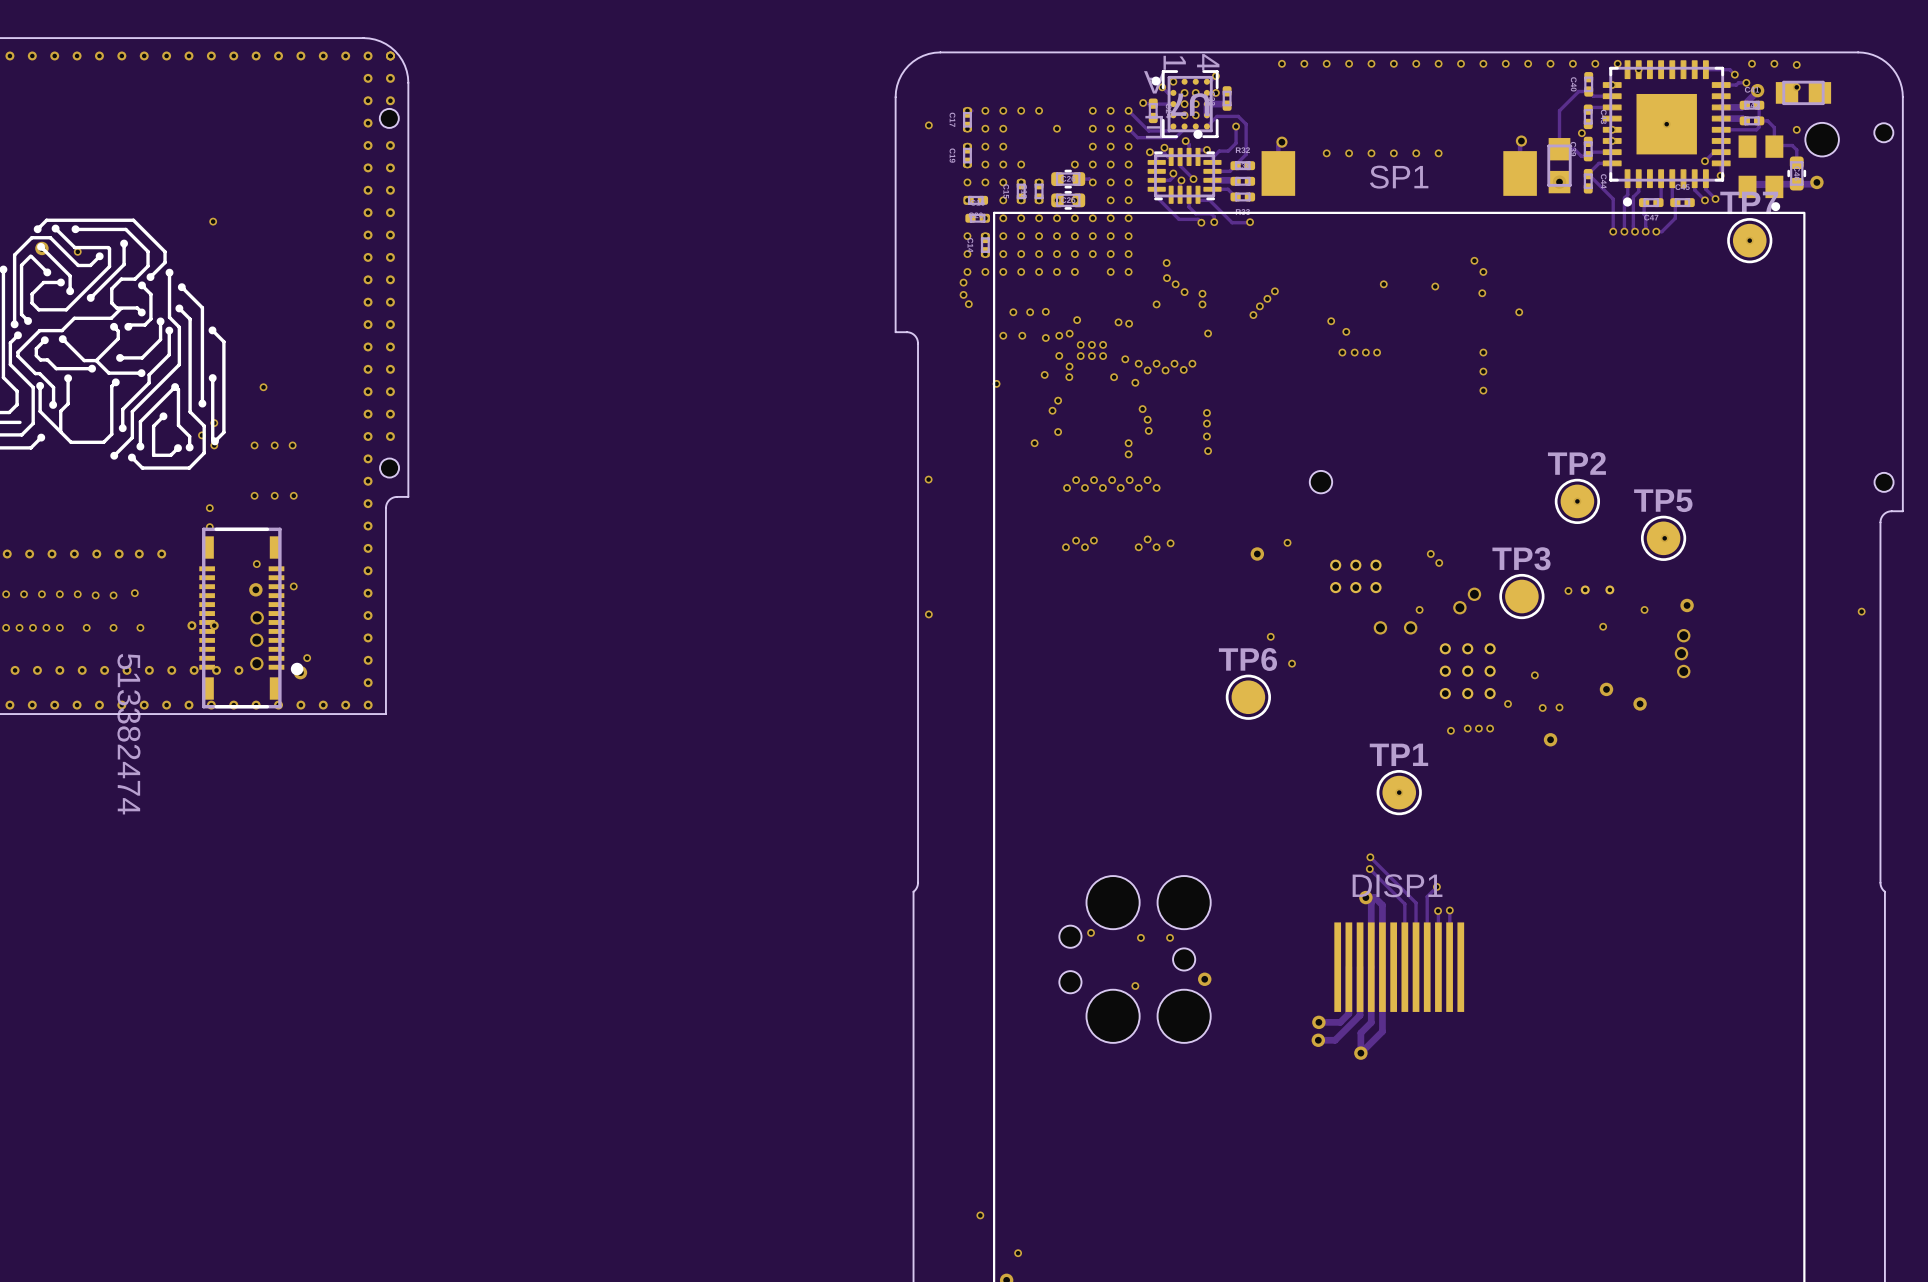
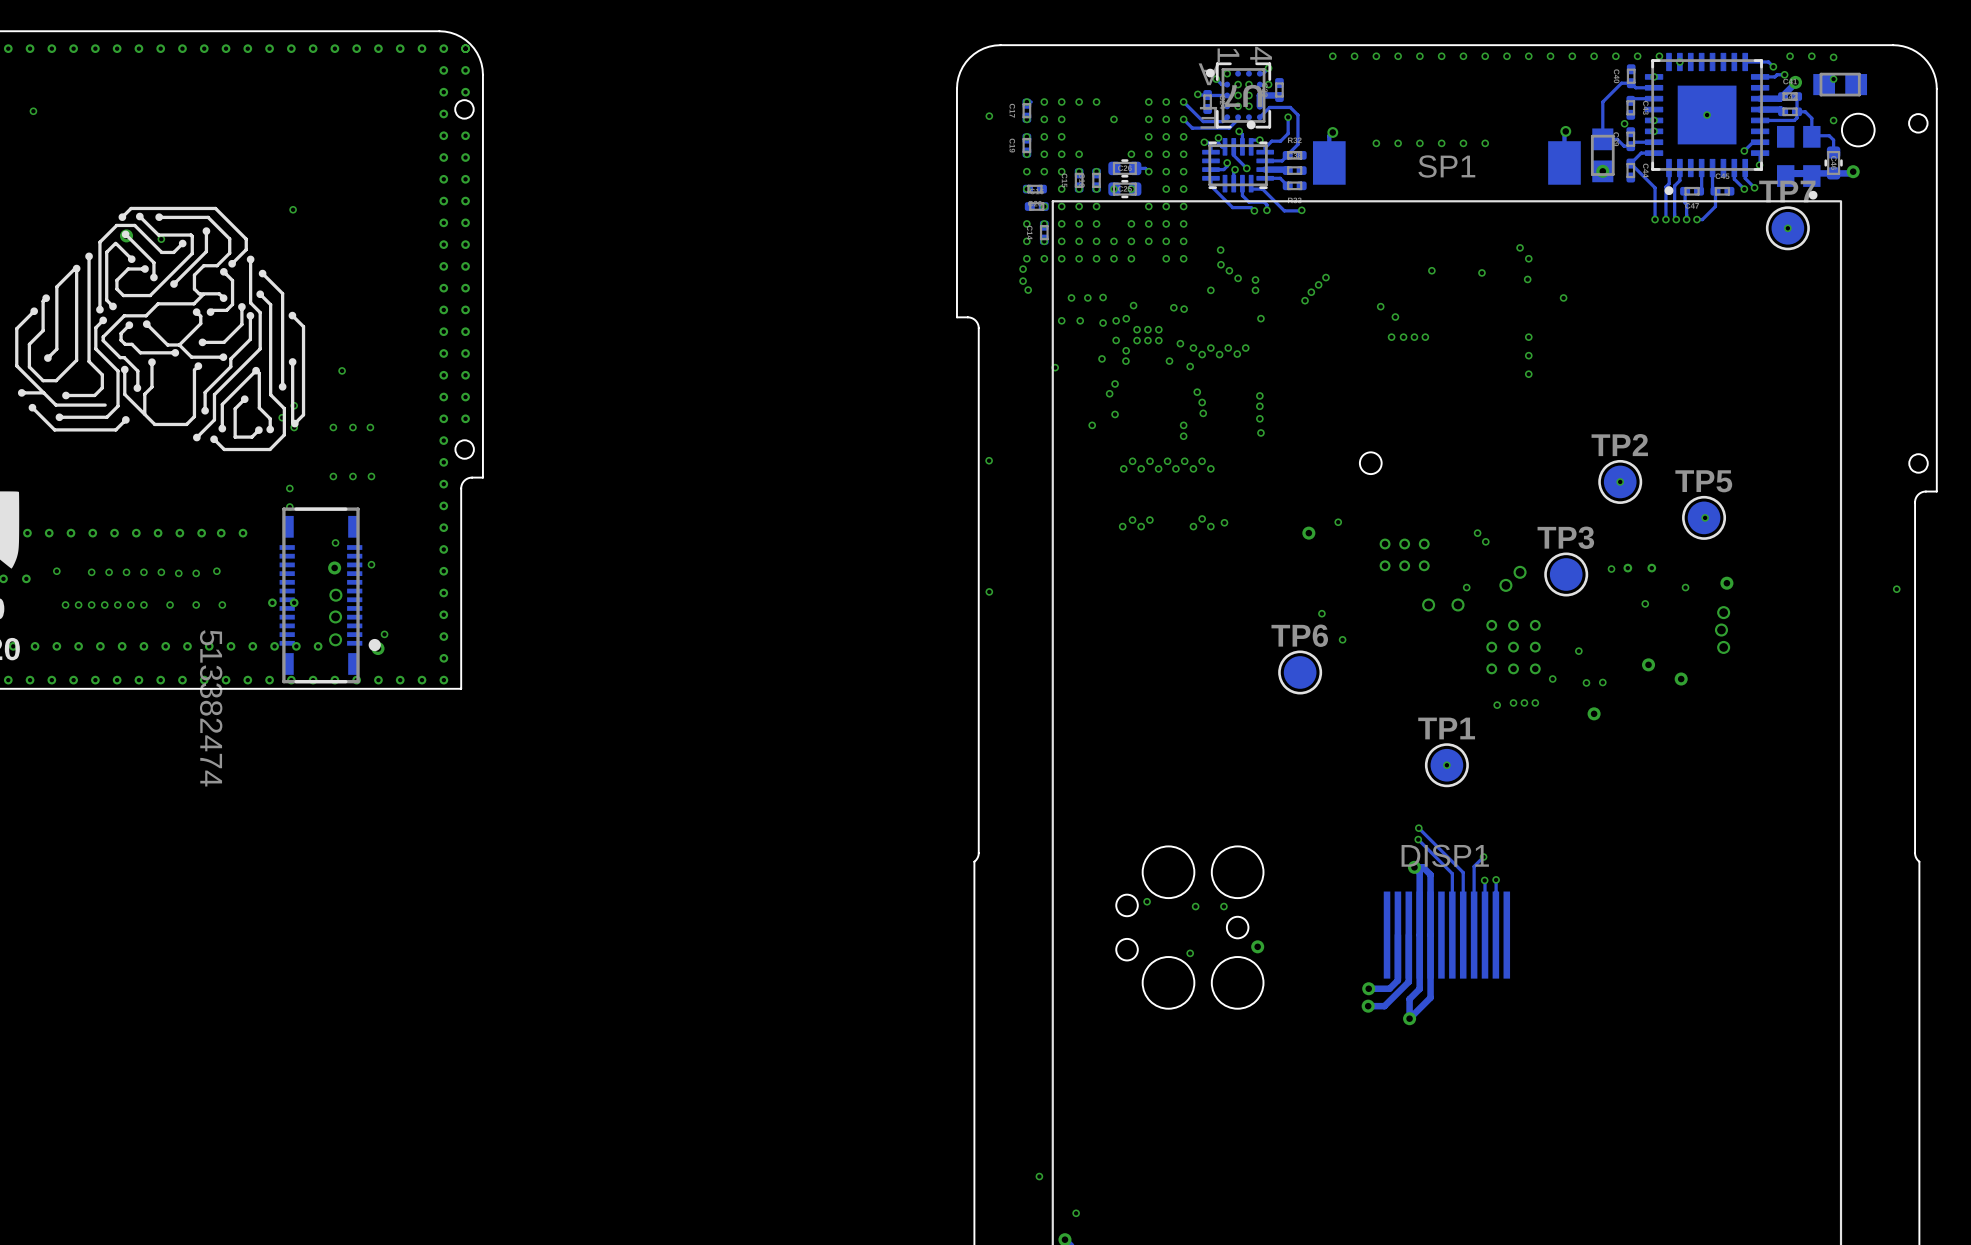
via: (1057, 218) -> none
via: (1074, 218) -> none
via: (1057, 236) -> none

